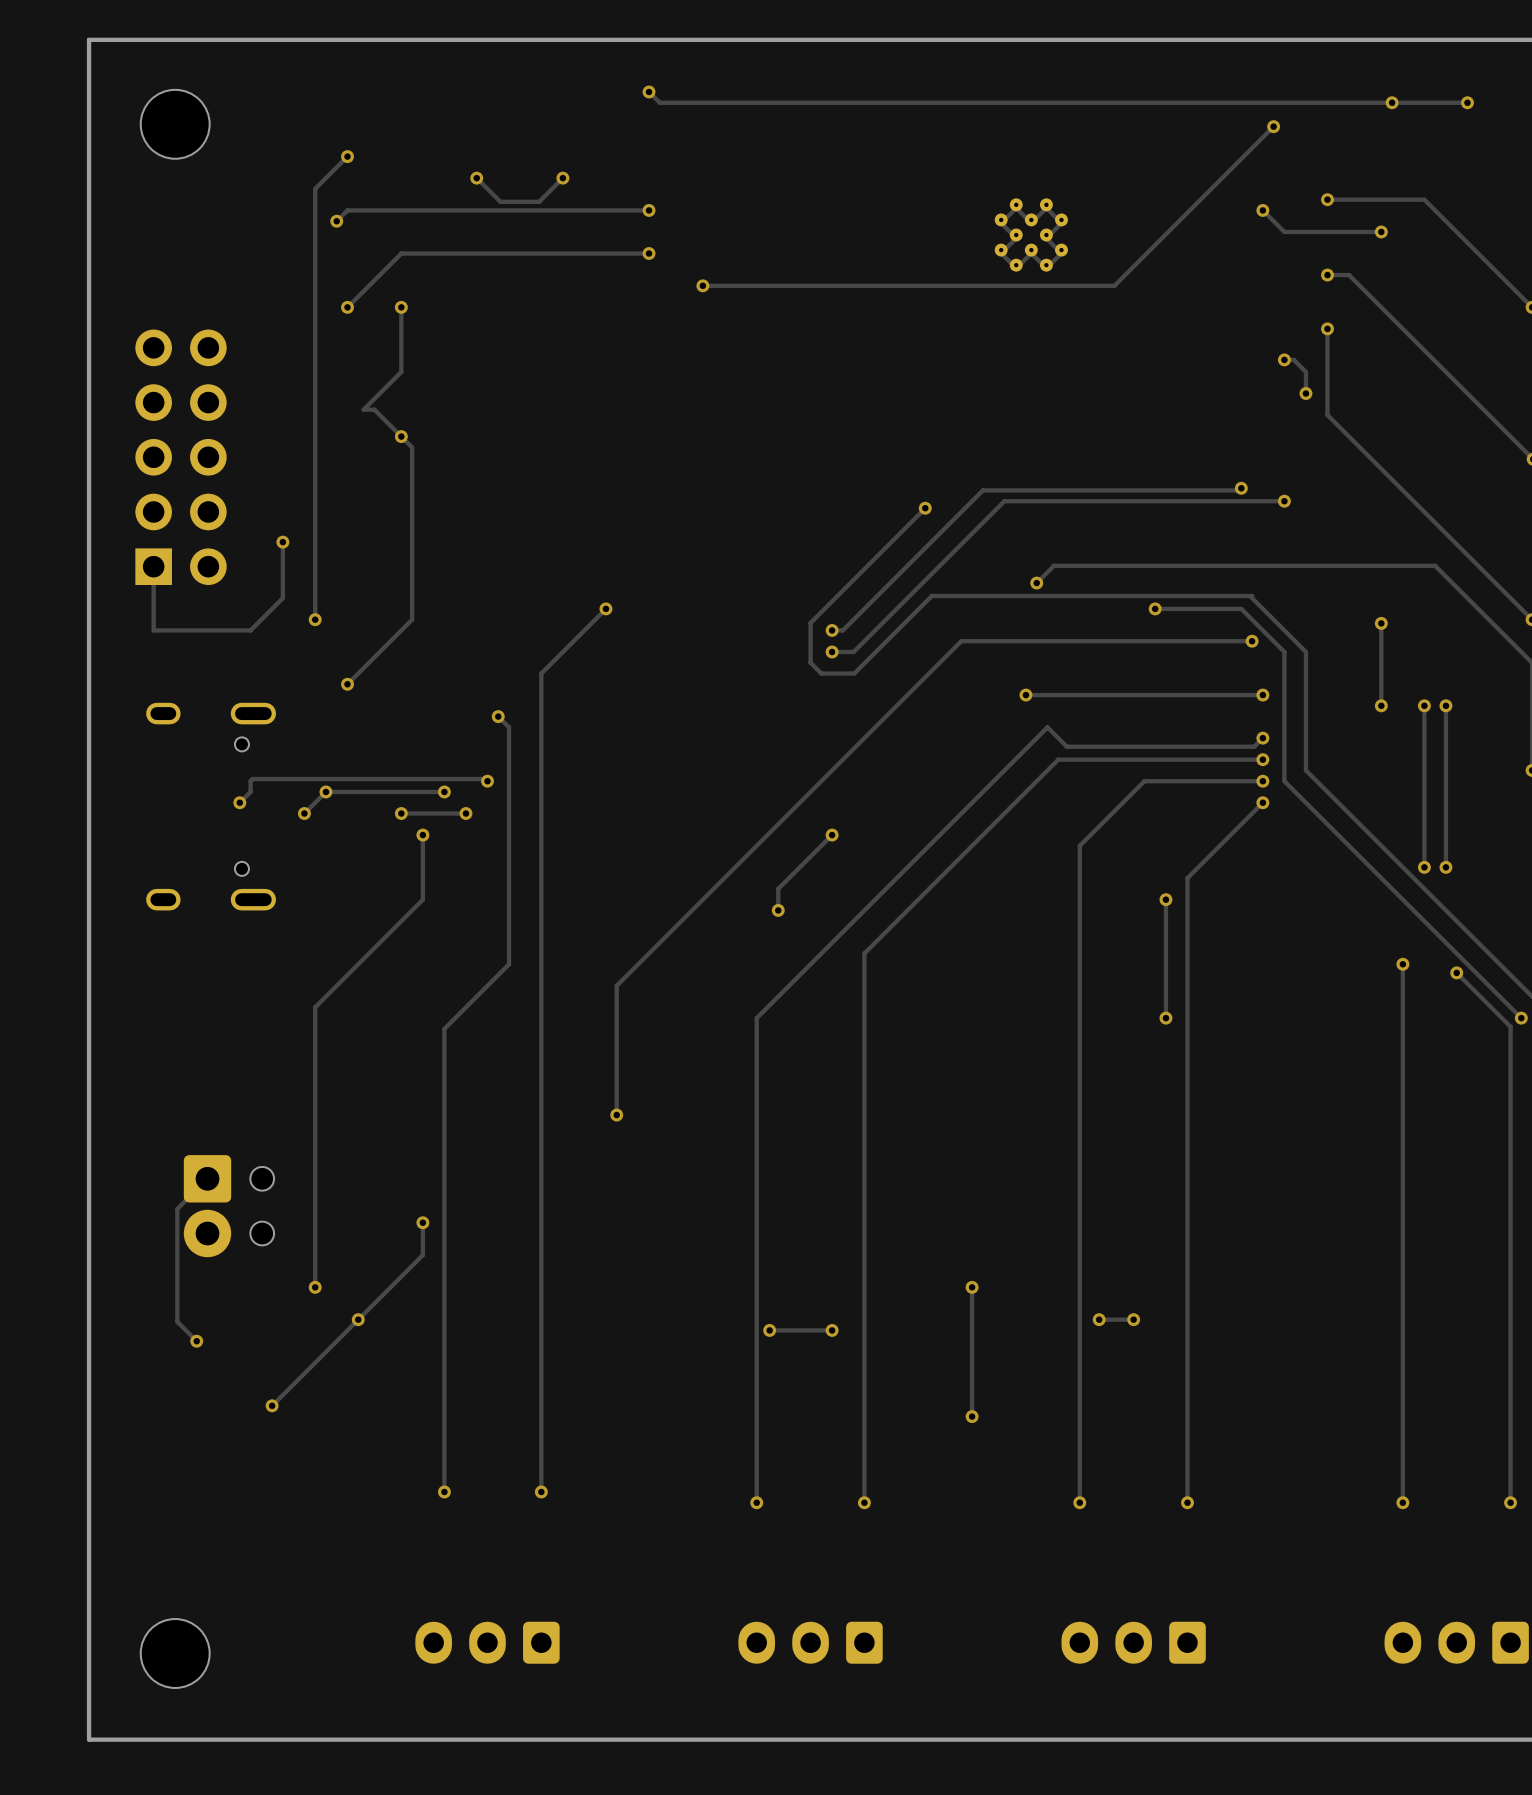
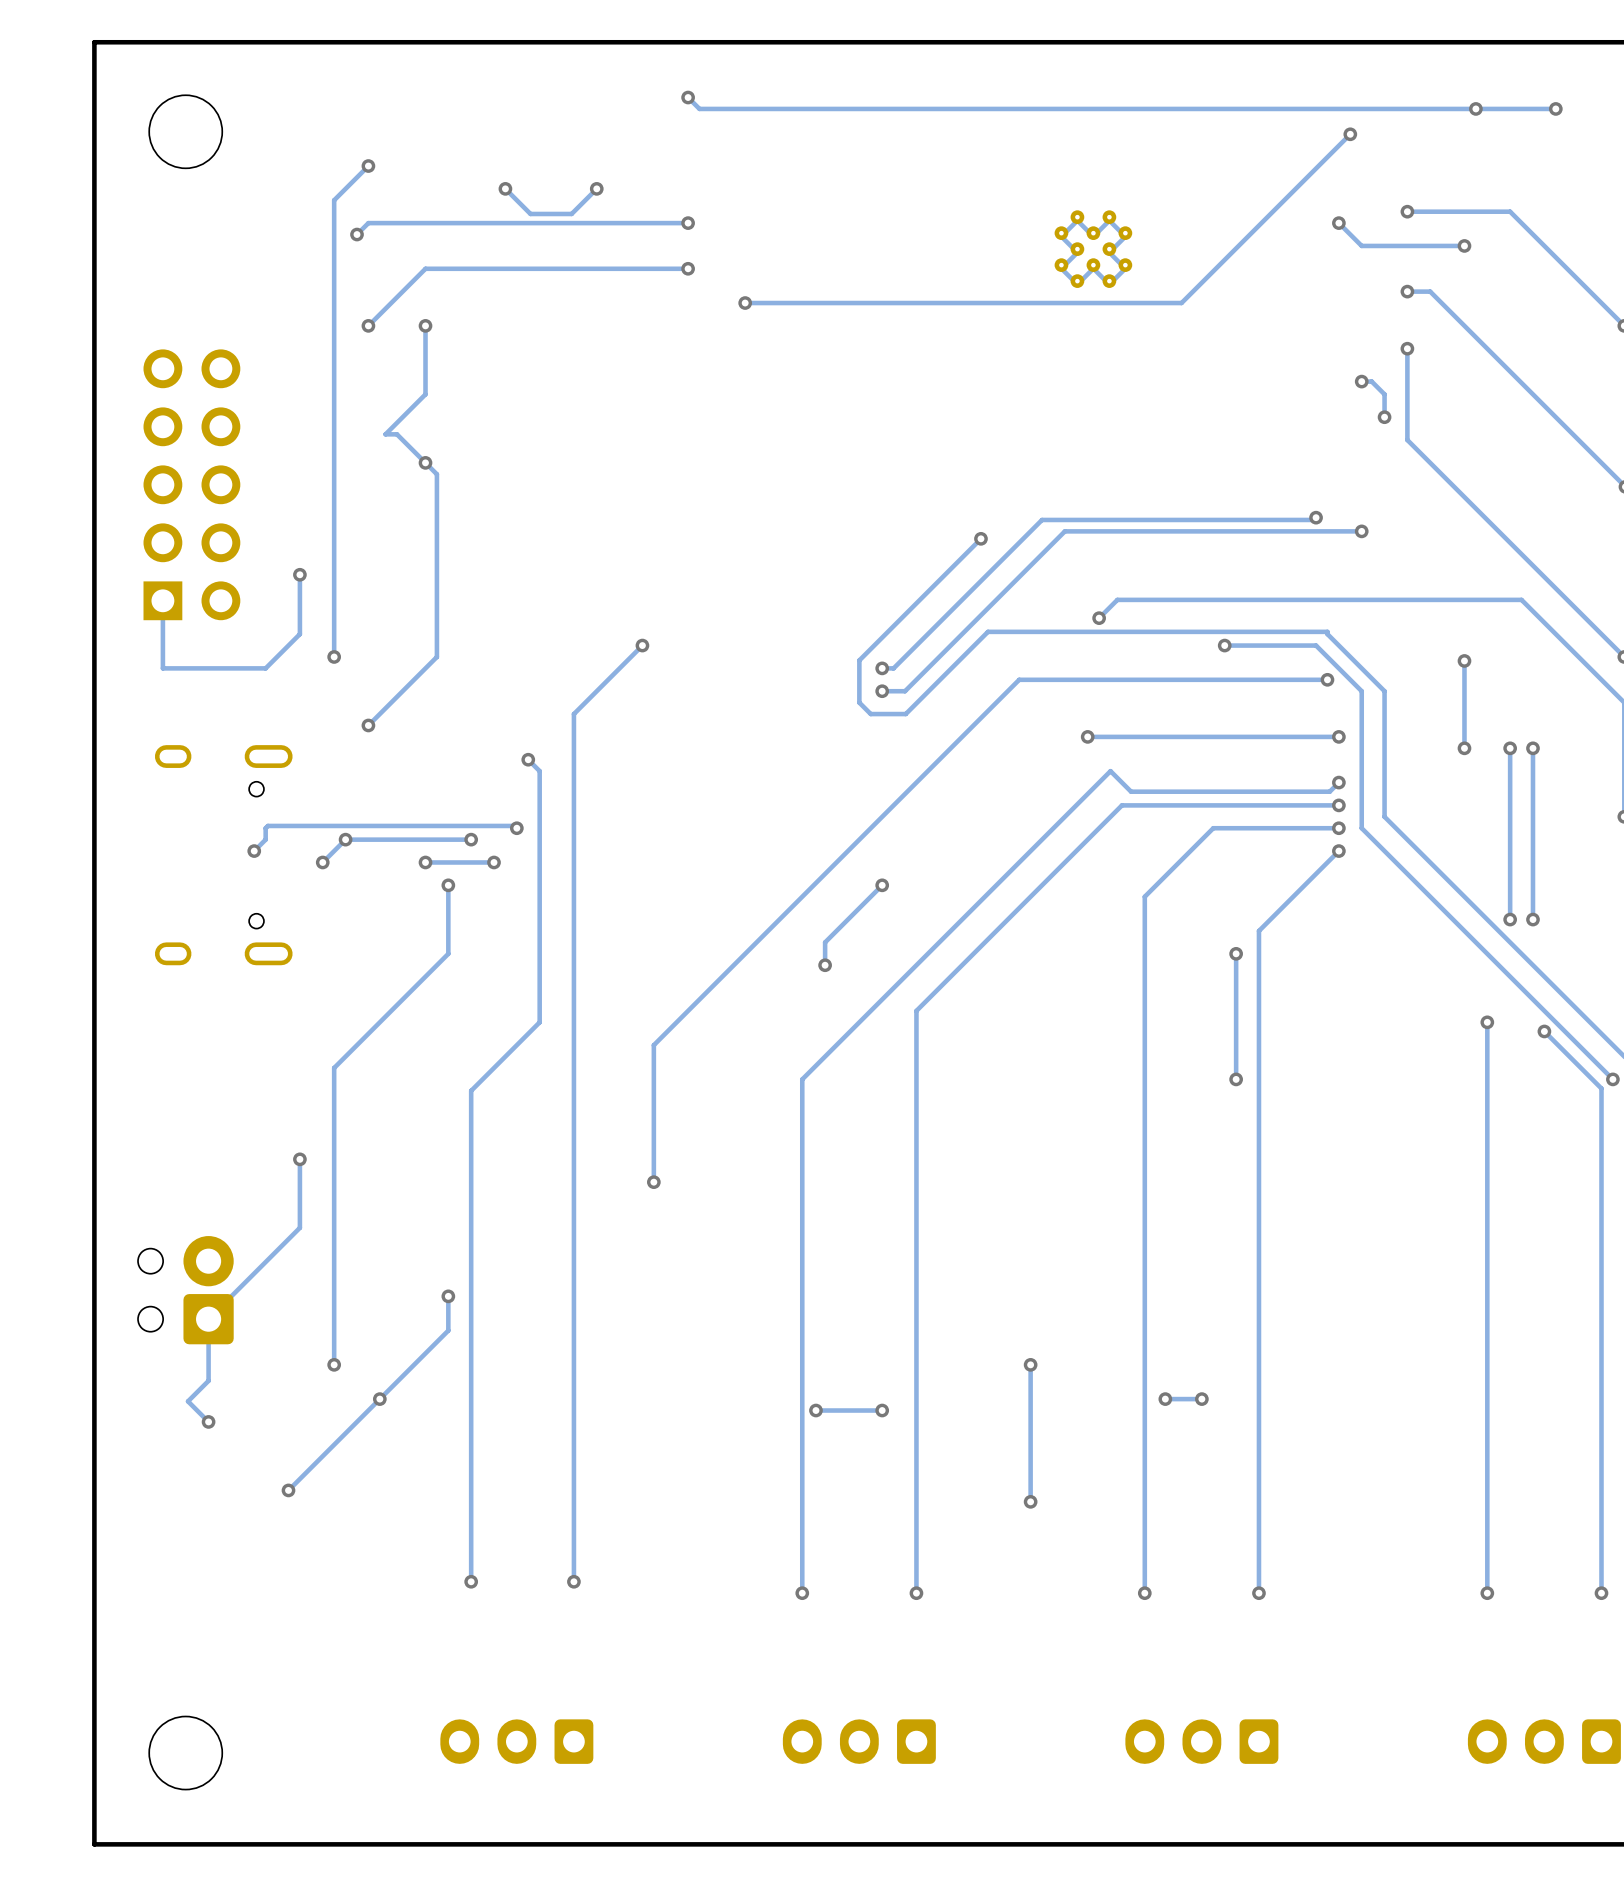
via: none -> (299, 1159)
track: (207, 1178) (177, 1208) (177, 1321) -> (299, 1159) (299, 1227) (208, 1319) (208, 1380) (188, 1401)
part rotation: 0° (228, 1206) -> 180° (185, 1290)

